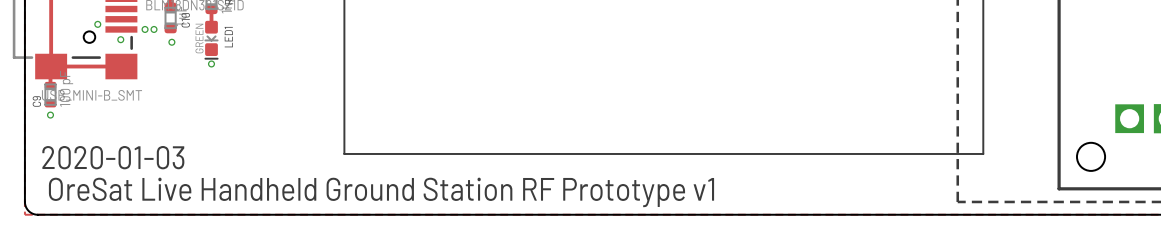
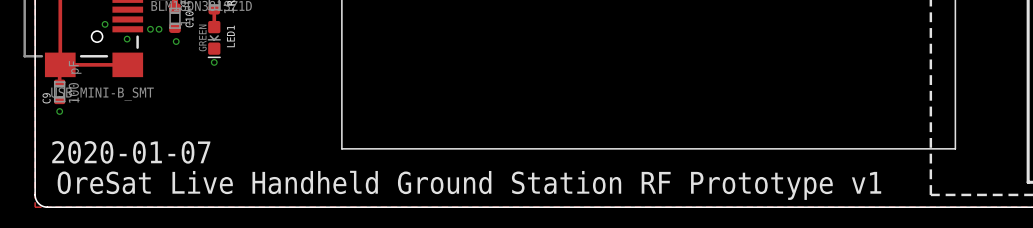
text: 2020-01-03 (113, 157) -> 2020-01-07 (131, 152)

